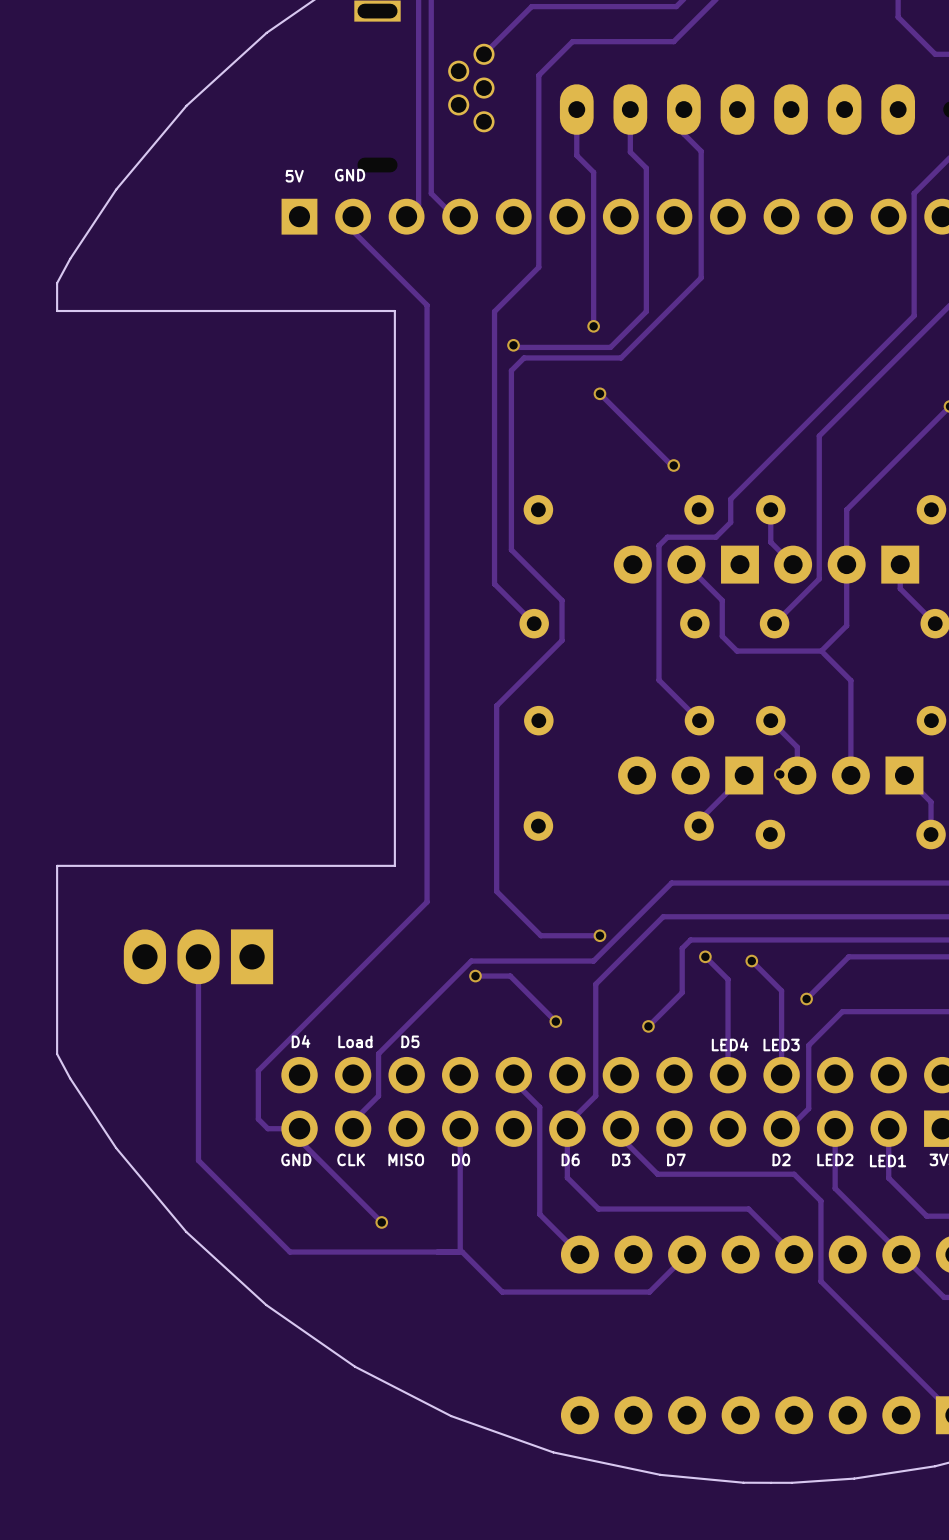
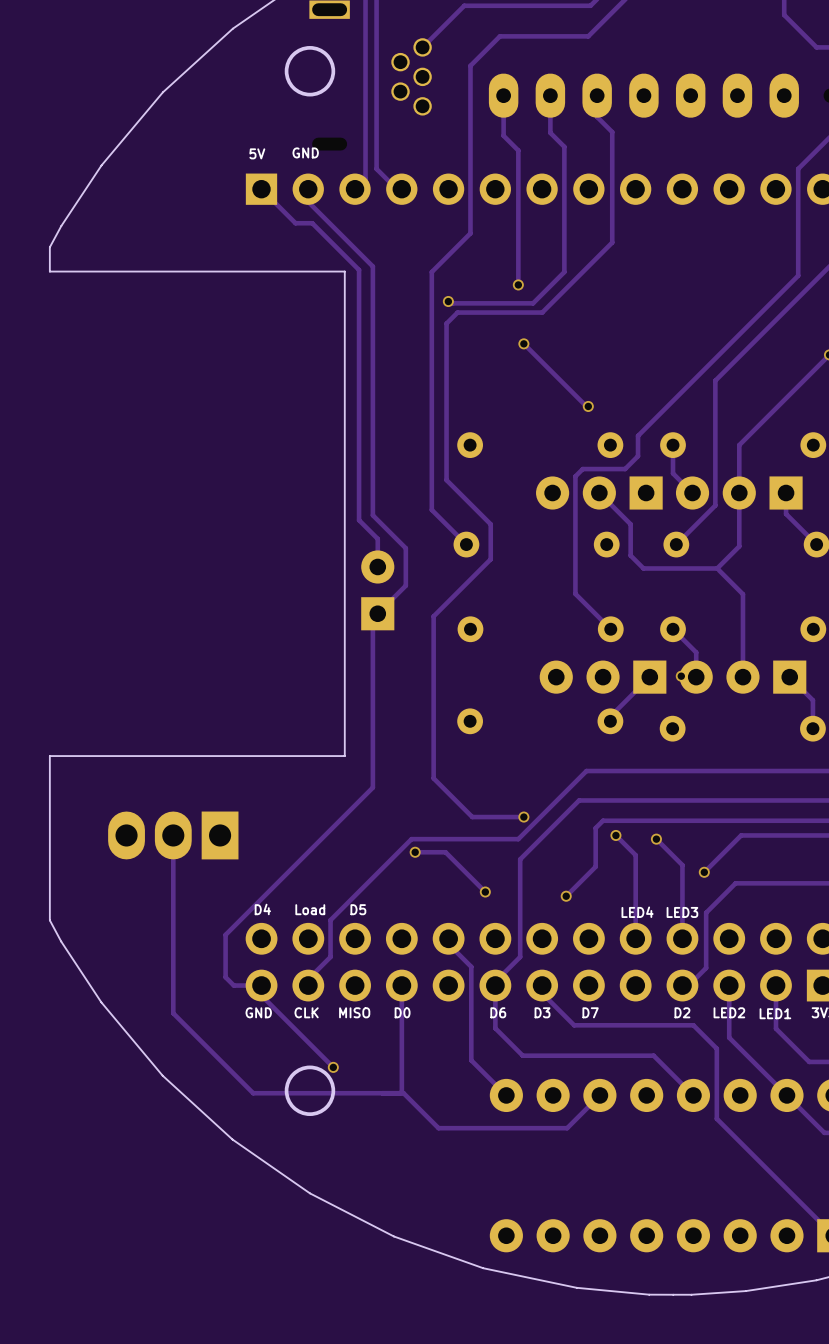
round board edge: none -> [284, 46, 336, 97]
track: none -> (261, 189) (295, 223) (312, 223) (359, 270) (359, 520) (377, 538) (377, 566)
track: (427, 590) (427, 708) -> (372, 515) (405, 548) (405, 585) (372, 618)
part: none -> (377, 590)
round board edge: none -> [284, 1065, 336, 1117]

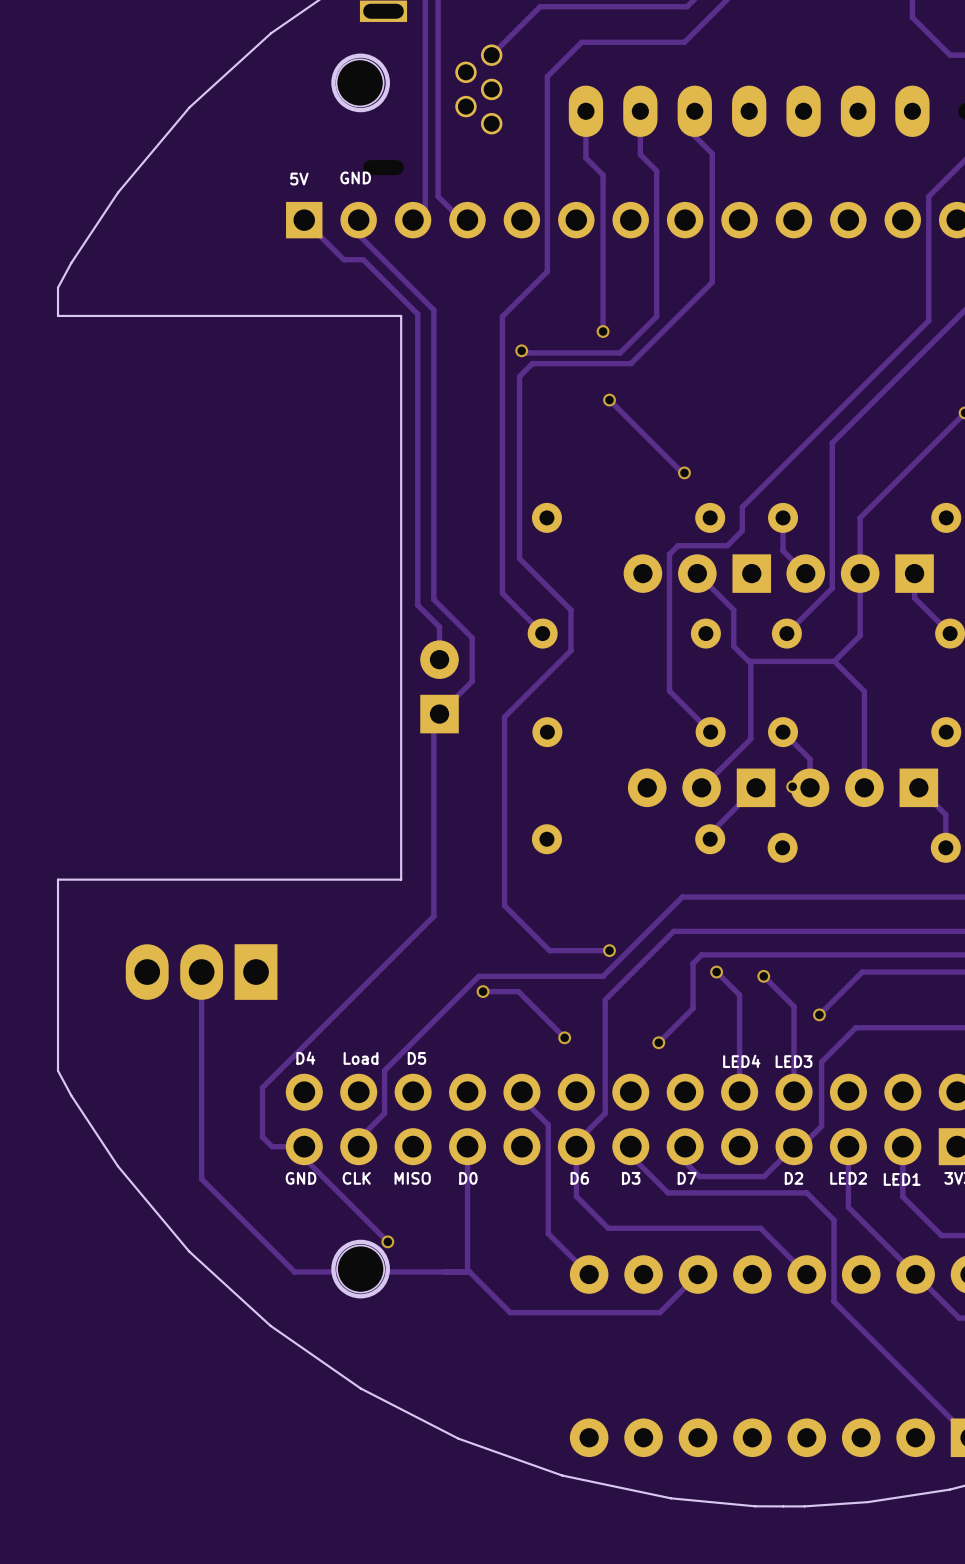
part: none -> (360, 82)
track: none -> (750, 661) (750, 739) (701, 787)
track: none -> (794, 1146) (764, 1176) (699, 1176) (685, 1162) (685, 1146)
part: none -> (360, 1269)

